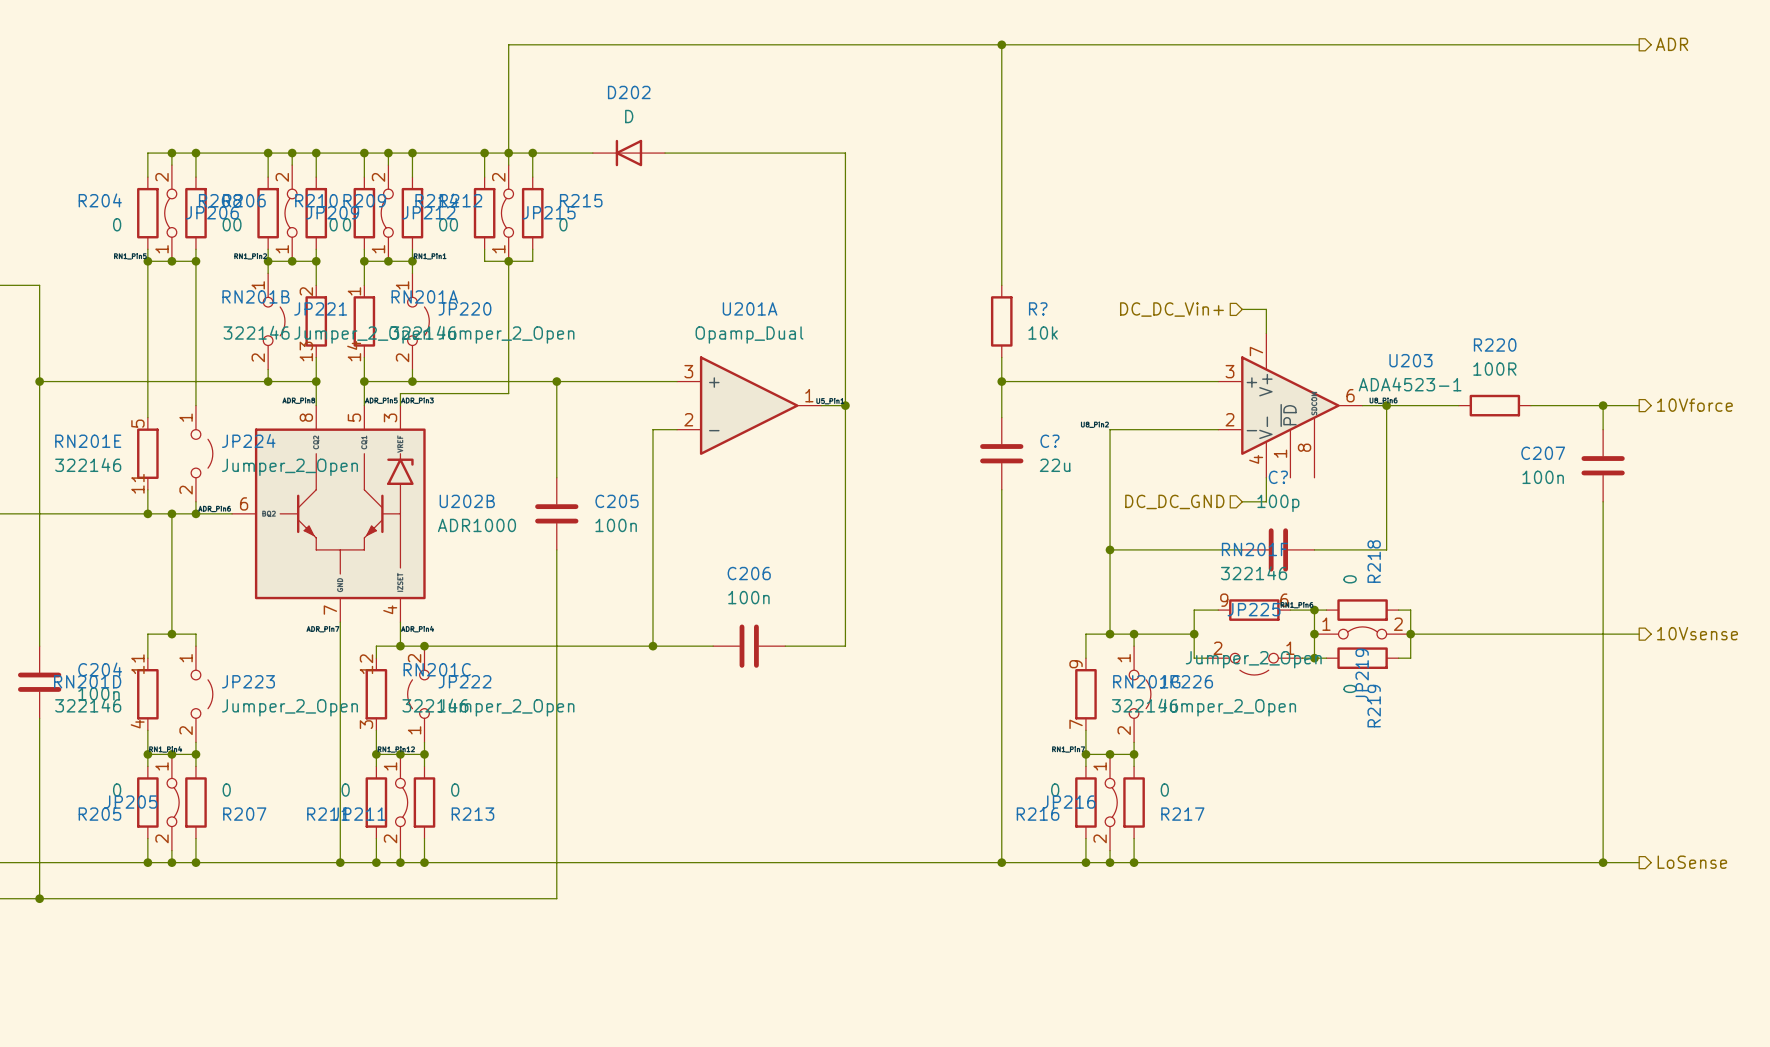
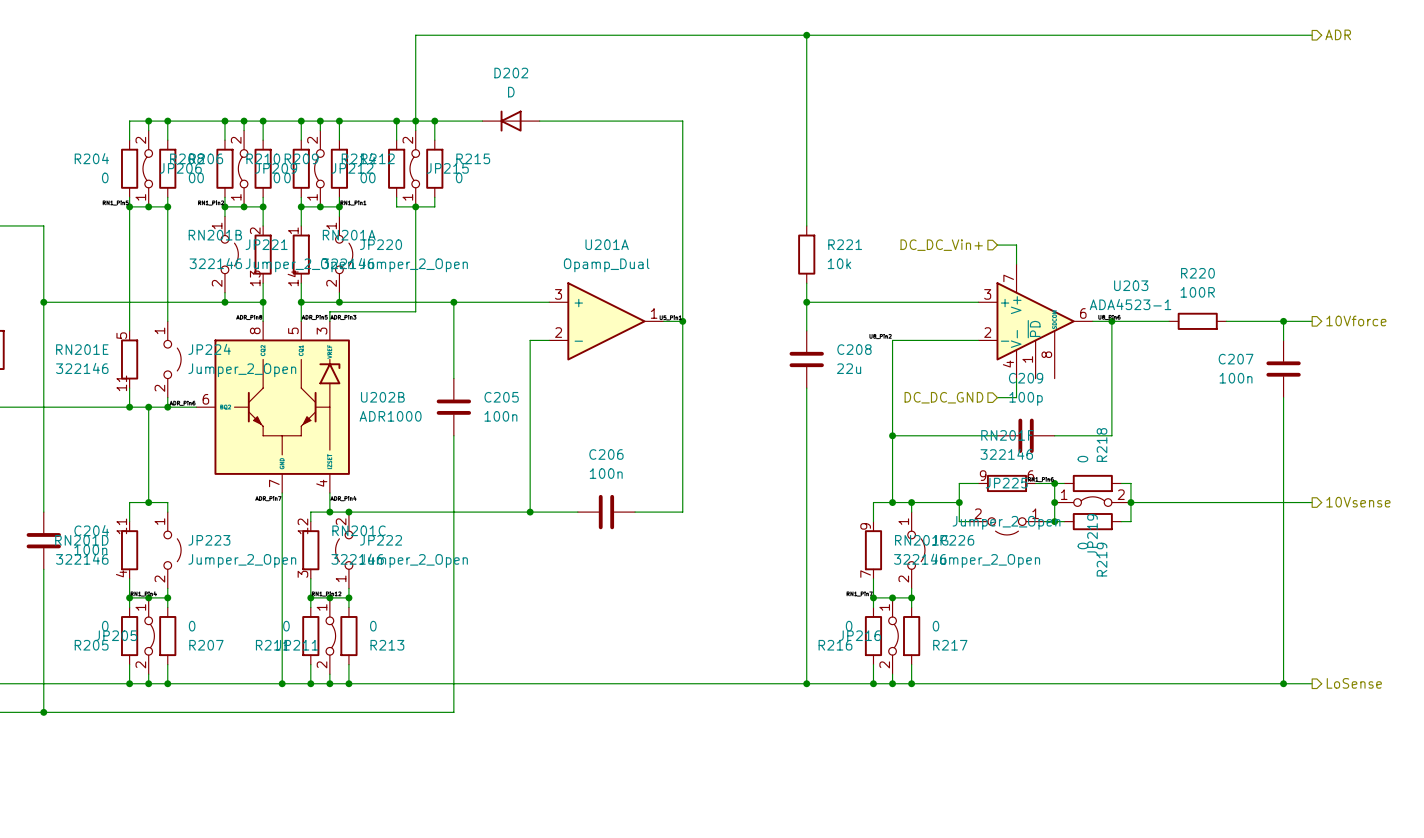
R? name: R? (1038, 308) -> R221 (845, 244)
C? name: C? (1049, 441) -> C208 (854, 349)
C? name: C? (1278, 477) -> C209 (1026, 378)

